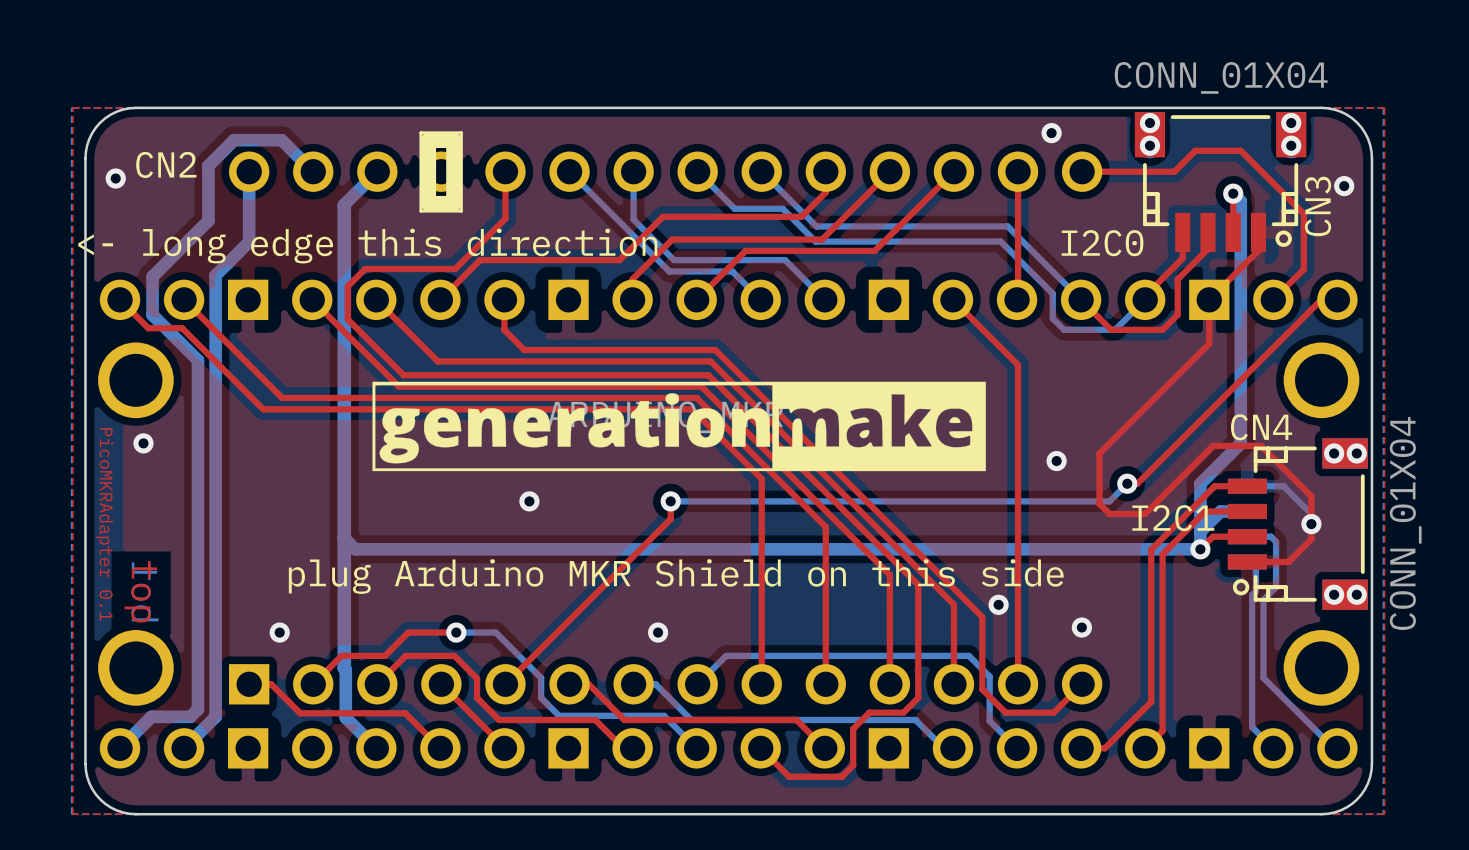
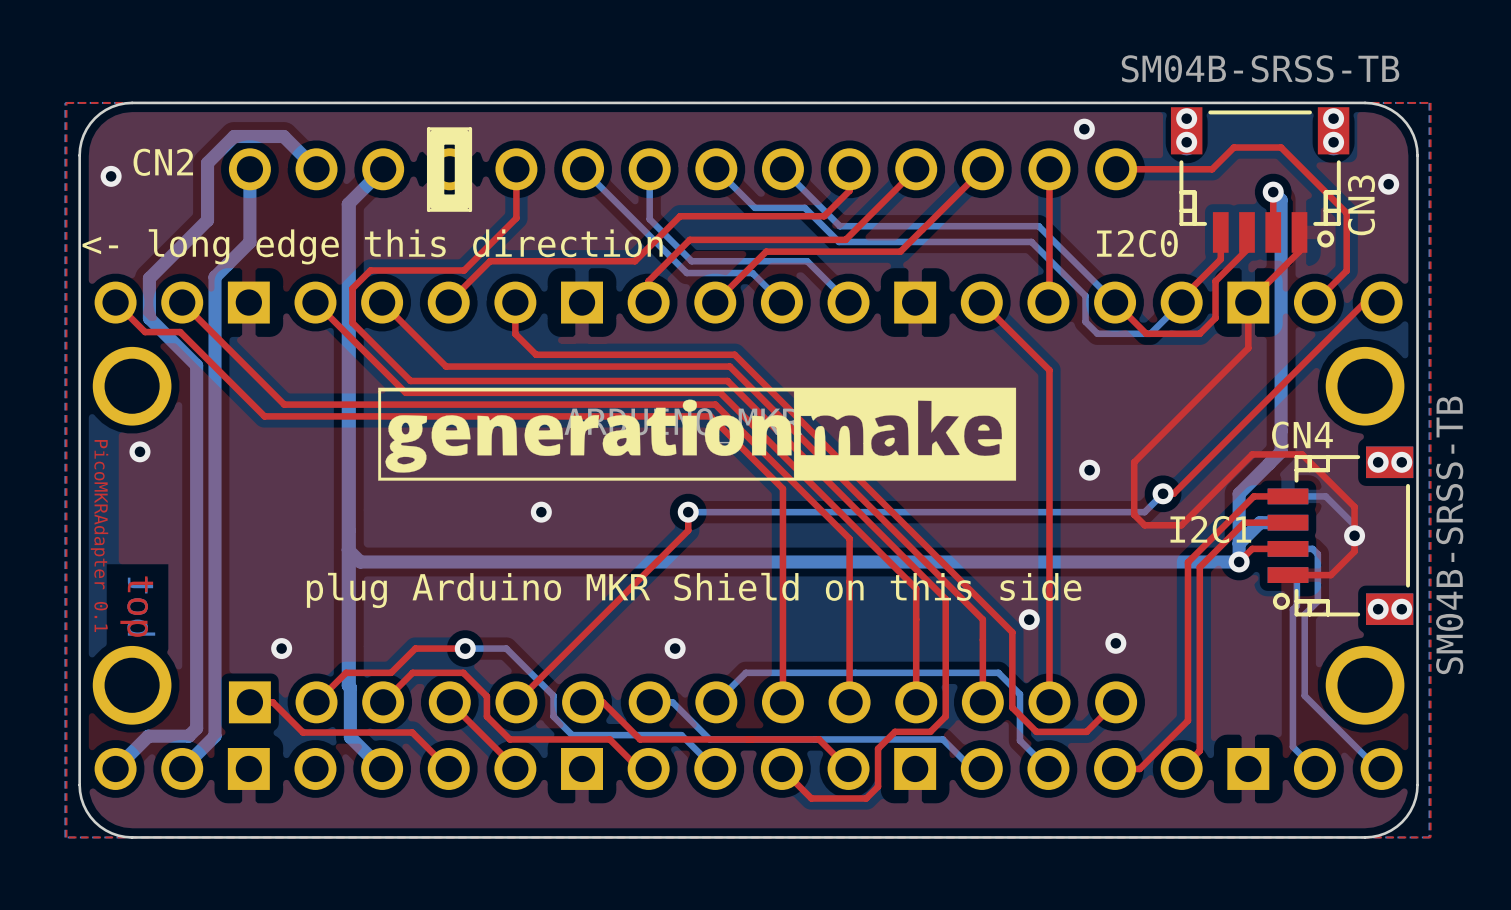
CN3 value: CONN_01X04 (1221, 77) -> SM04B-SRSS-TB (1260, 68)
CN4 value: CONN_01X04 (1405, 523) -> SM04B-SRSS-TB (1449, 535)

